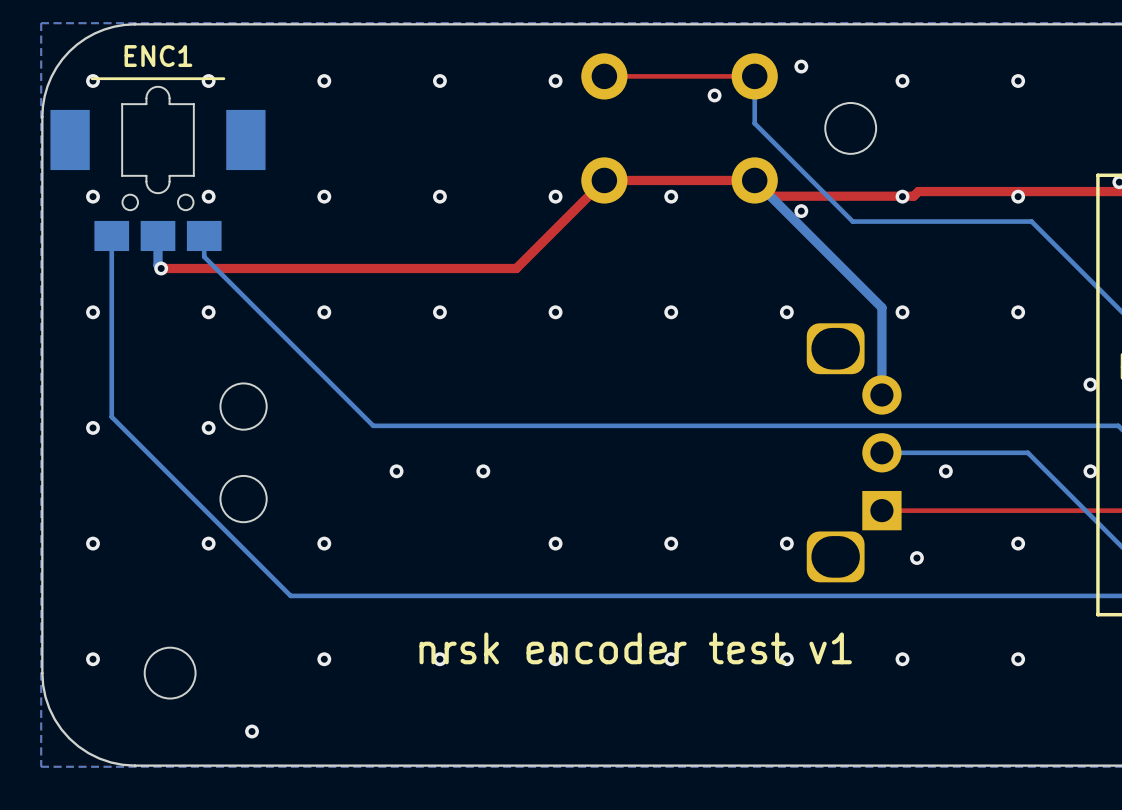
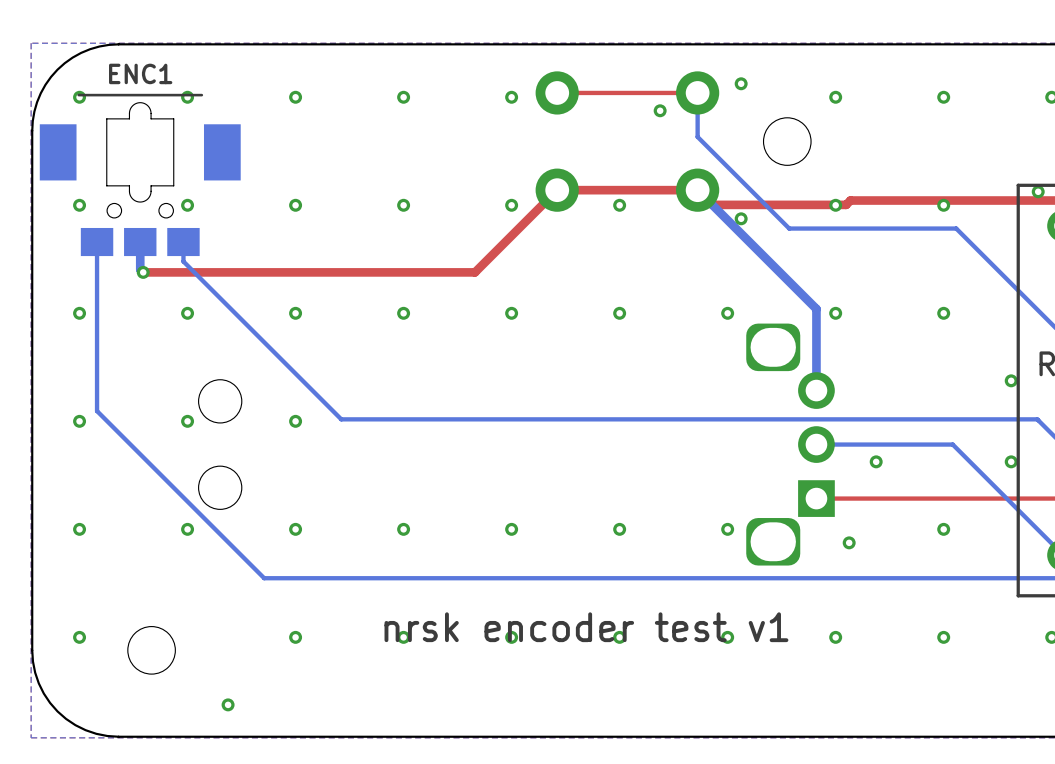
via: none -> (295, 421)
via: (396, 471) -> none
via: (483, 471) -> none
via: none -> (403, 529)

